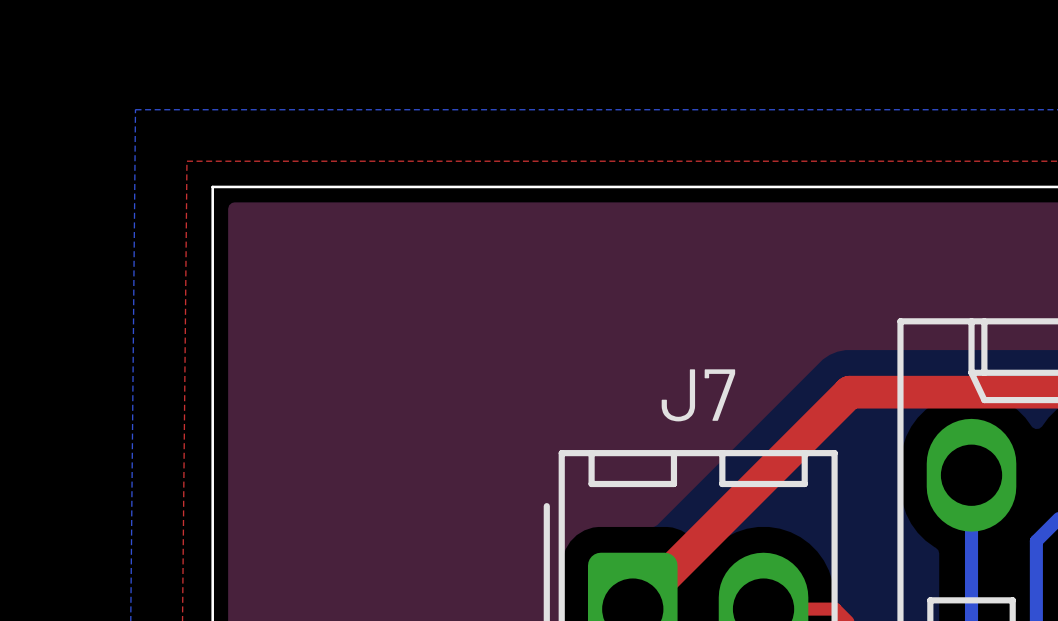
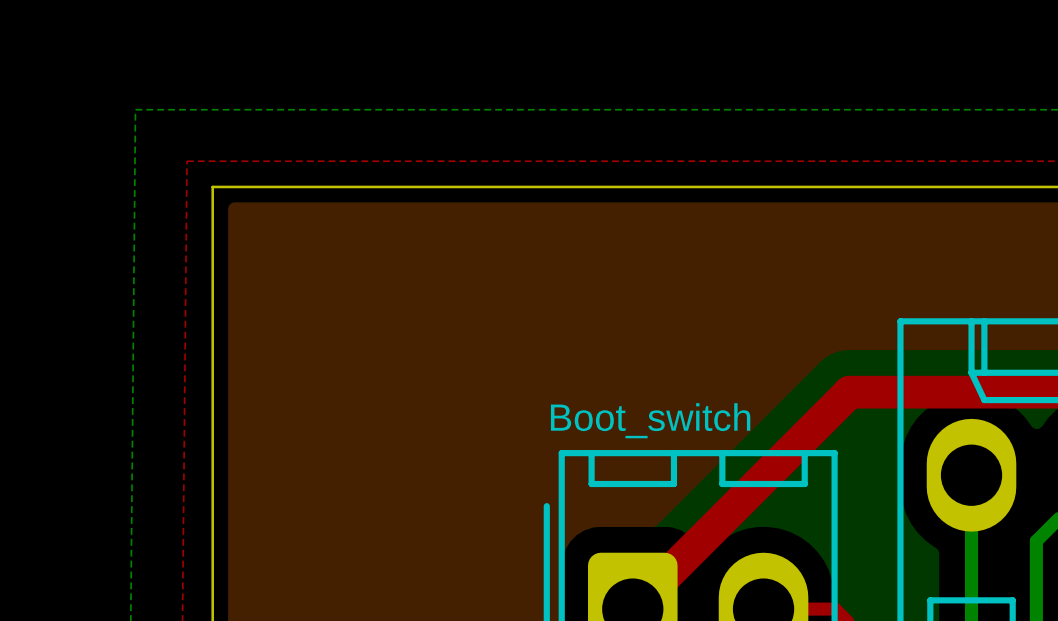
J7 name: J7 (698, 395) -> Boot_switch (650, 420)

